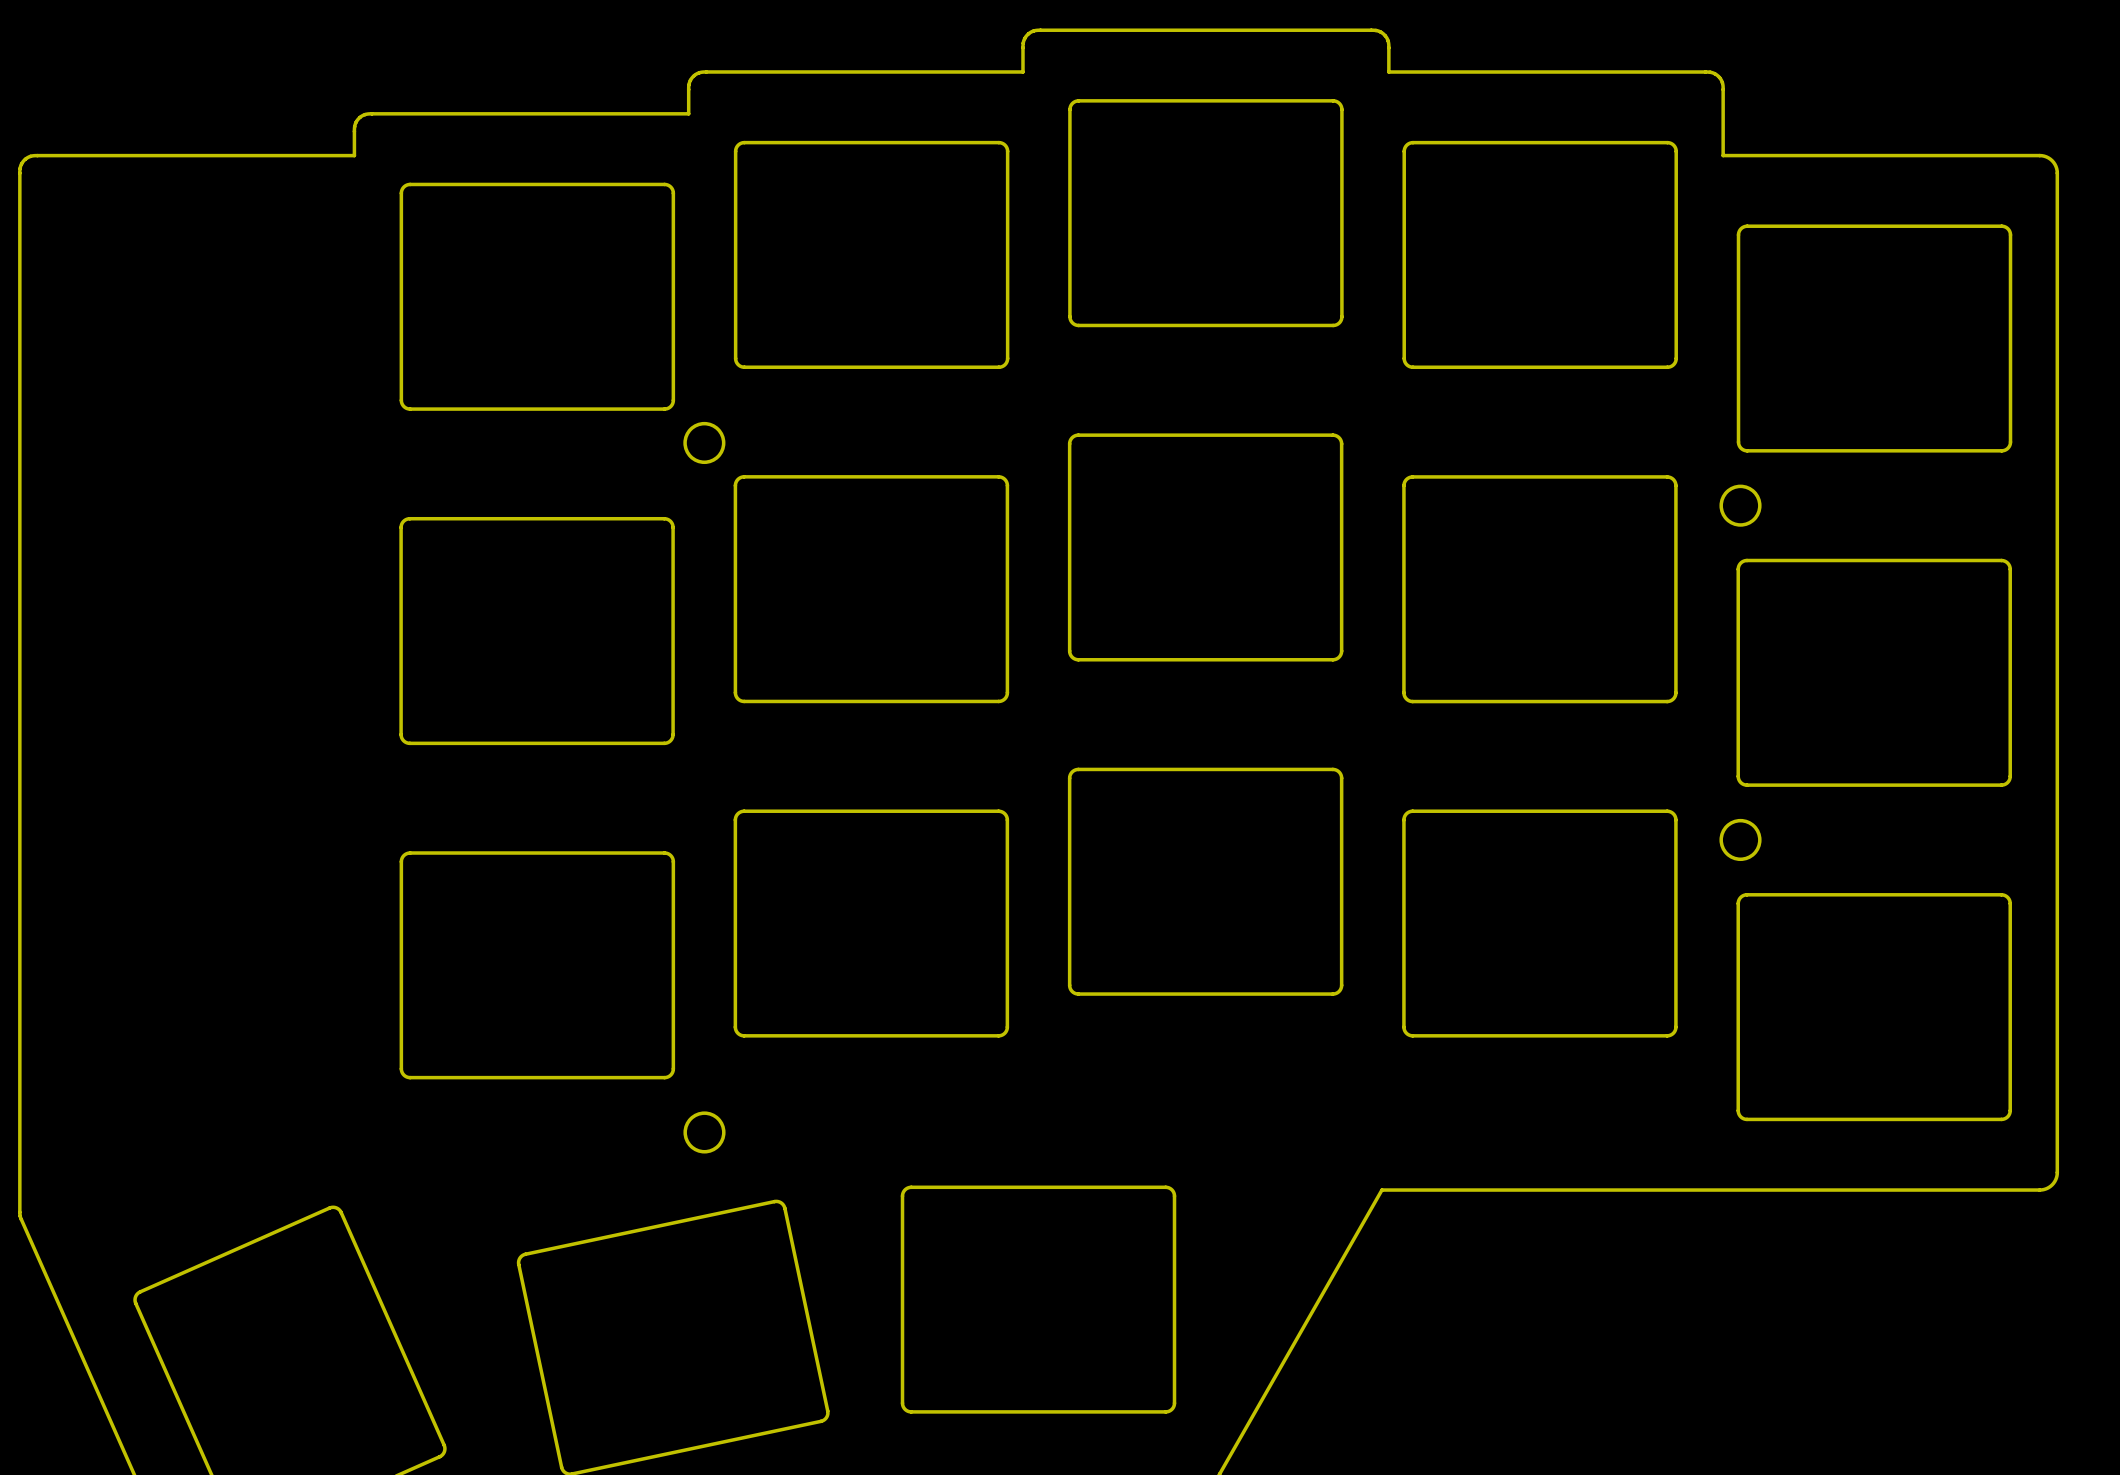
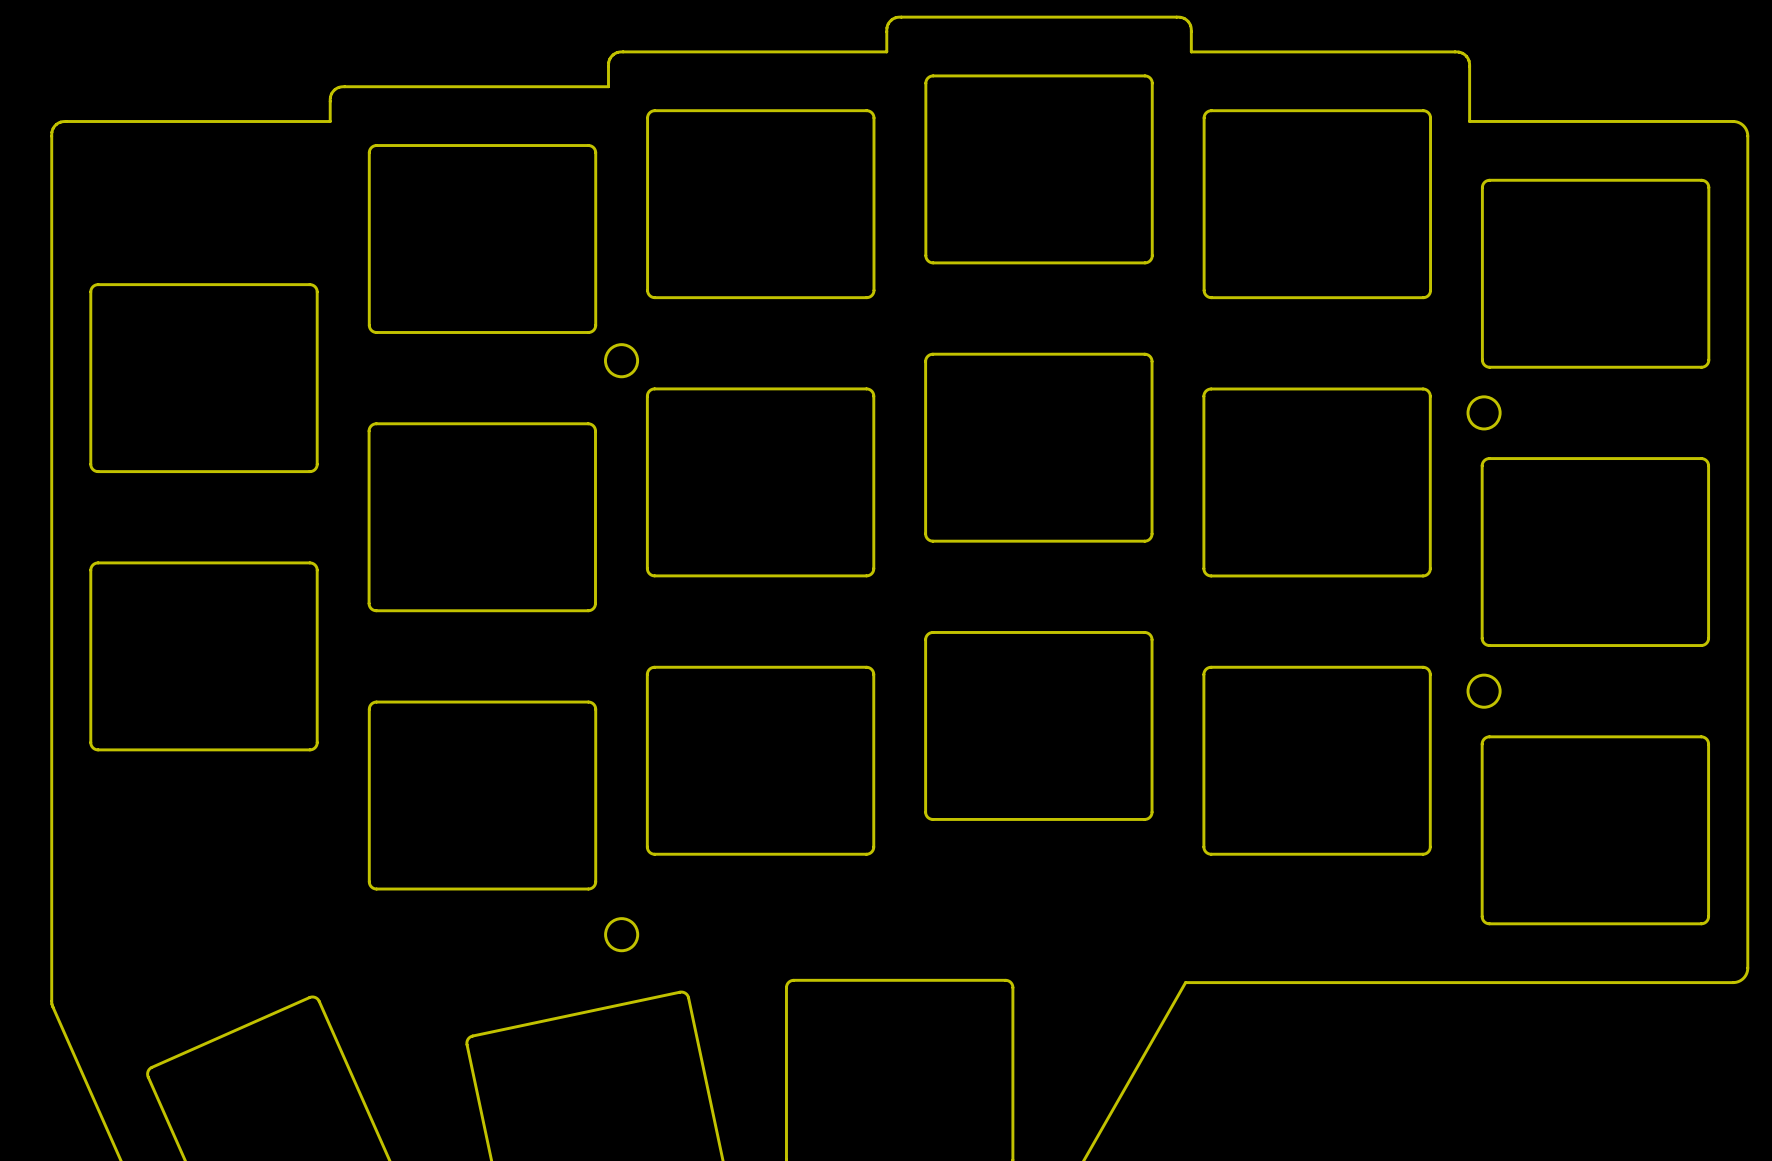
board edge: none -> (309, 284) (93, 286) (90, 291) (92, 468) (98, 471) (314, 470) (317, 464) (317, 291) (315, 286) (309, 284)
board edge: none -> (309, 562) (93, 564) (90, 570) (92, 747) (98, 749) (314, 748) (317, 742) (317, 570) (315, 565) (309, 562)

